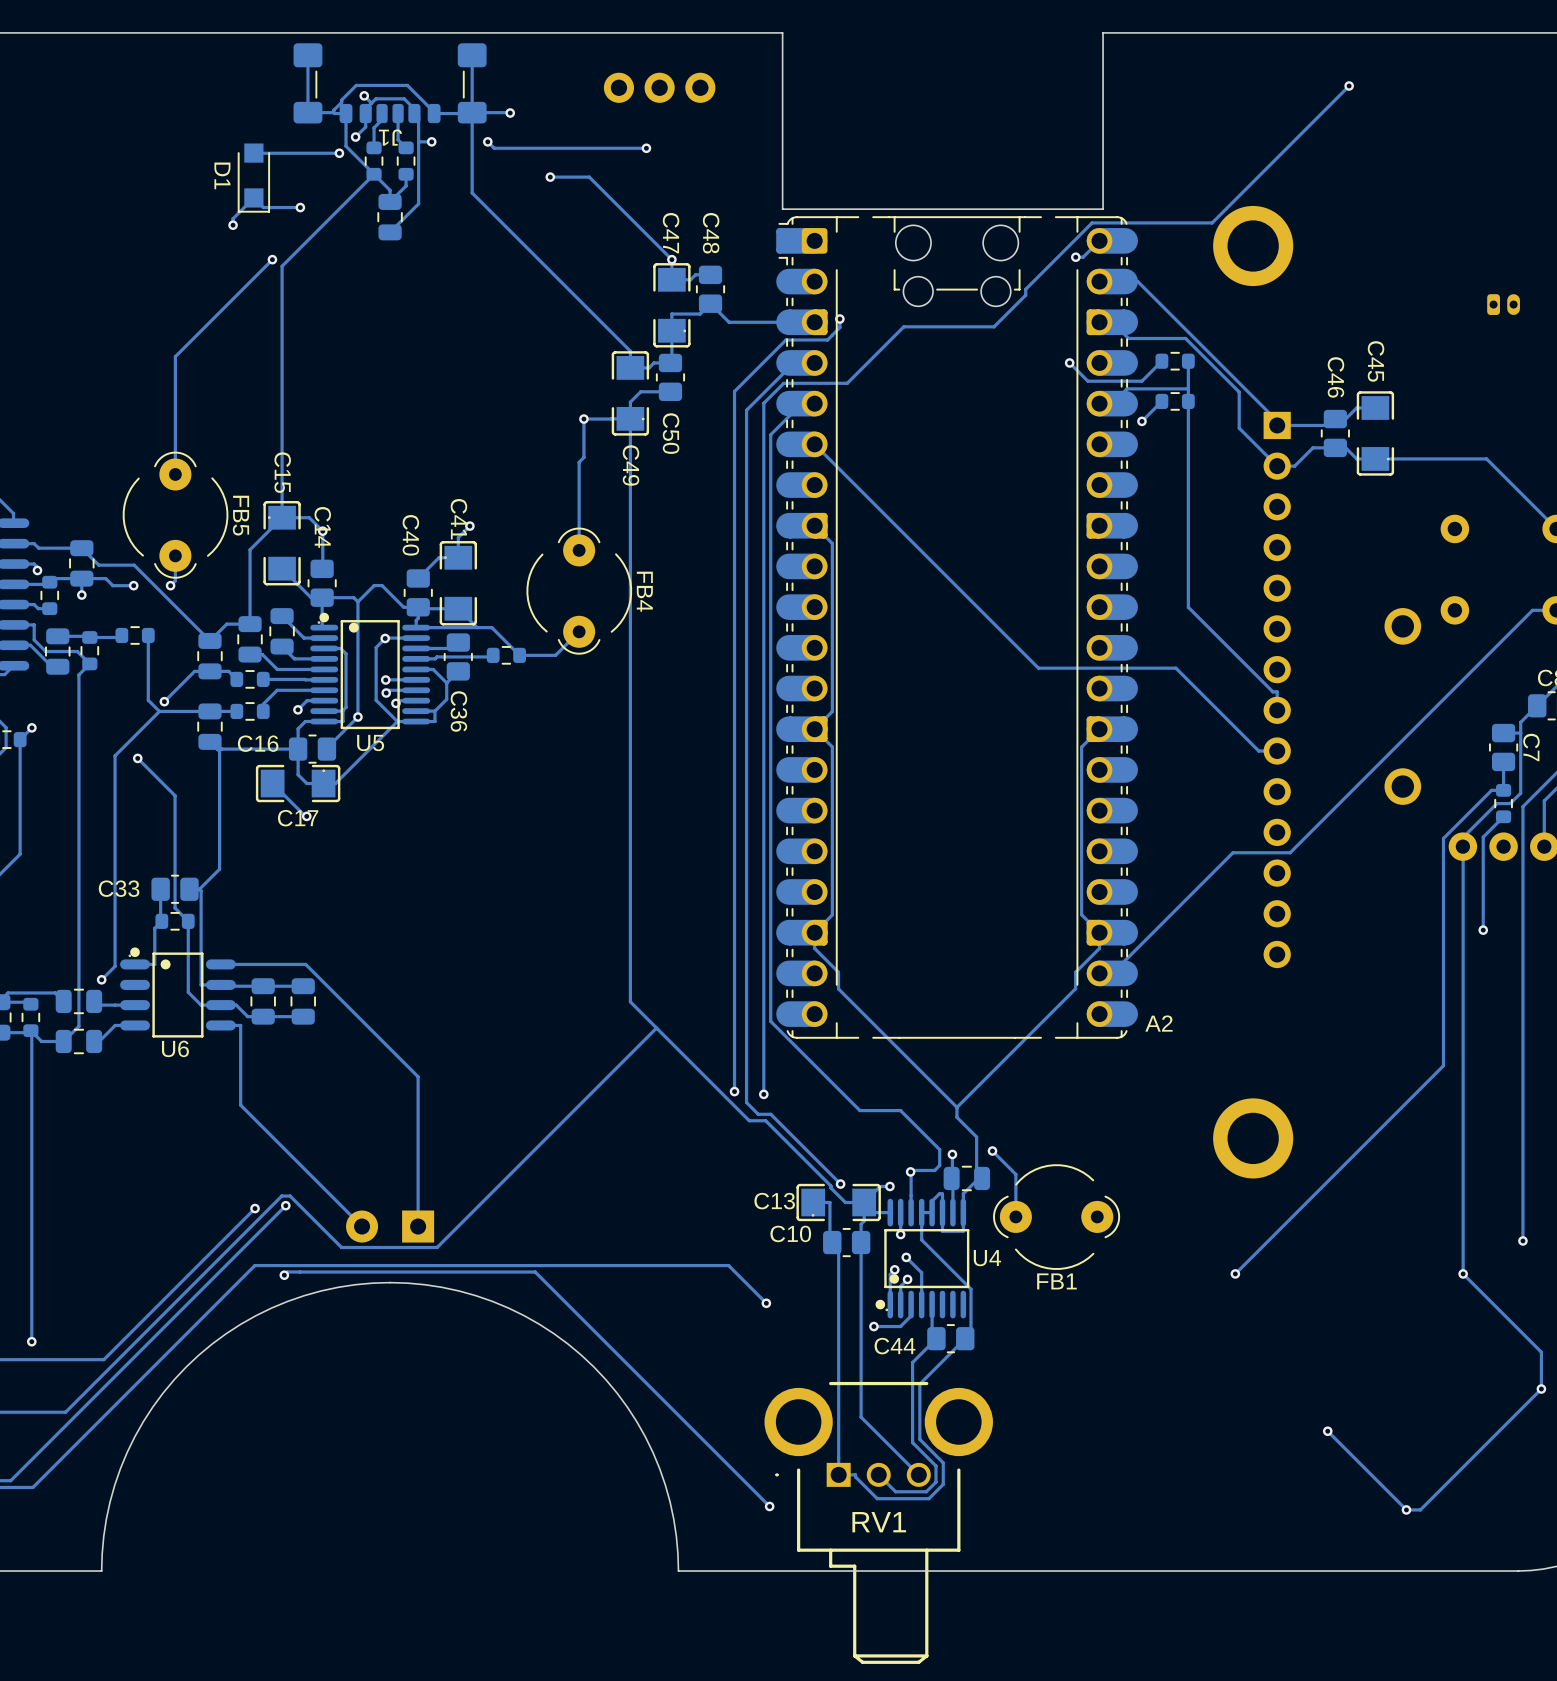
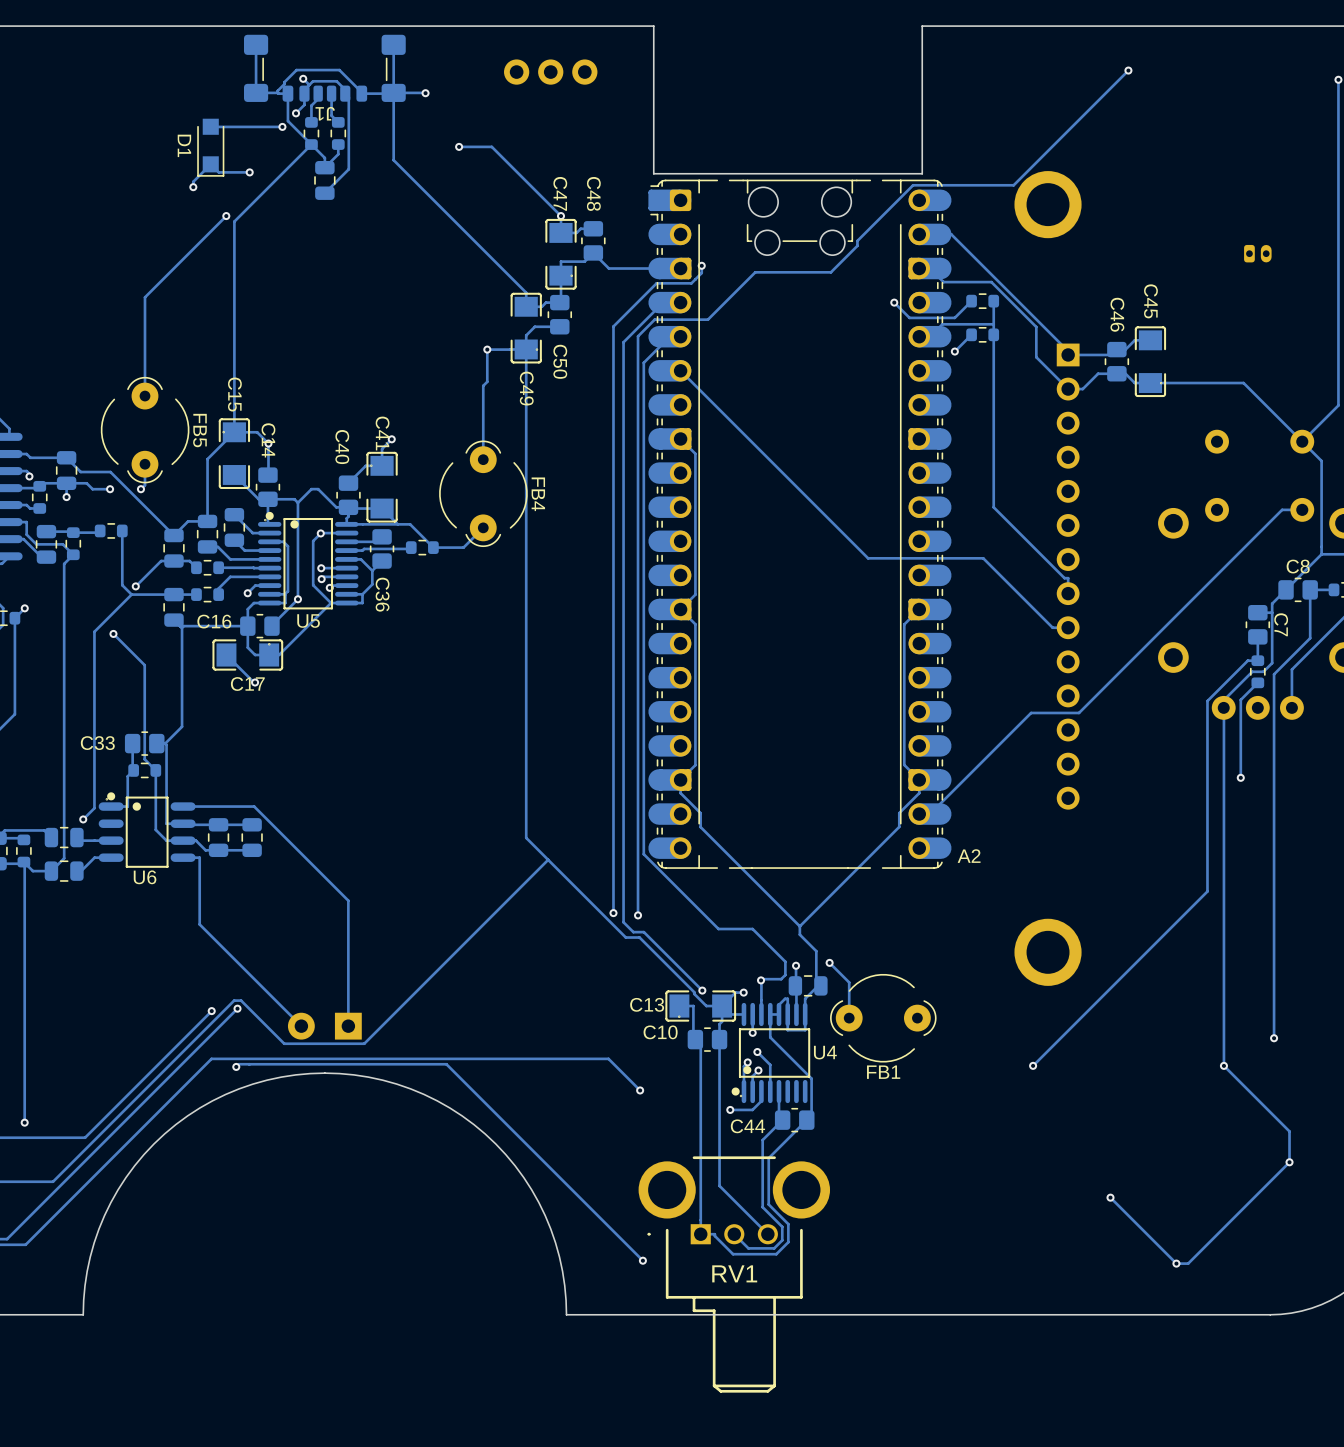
track: (431, 141) (418, 141) -> none
via: (431, 141) -> none
track: (487, 141) (494, 148) (646, 148) -> none
via: (487, 141) -> none
via: (646, 148) -> none
track: (1099, 240) (1083, 257) (1075, 257) -> none
via: (1075, 257) -> none

